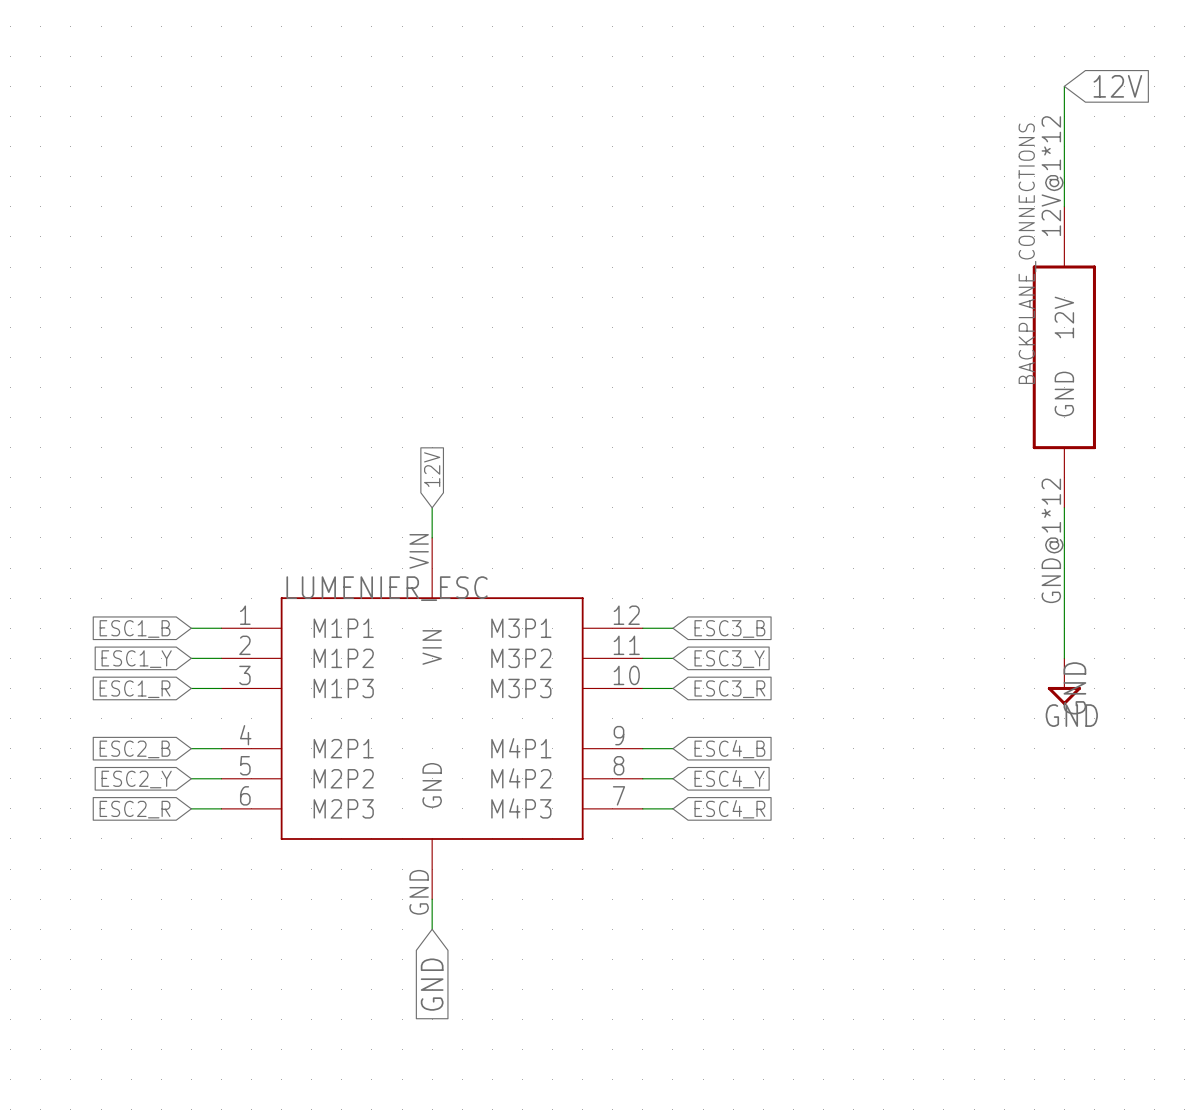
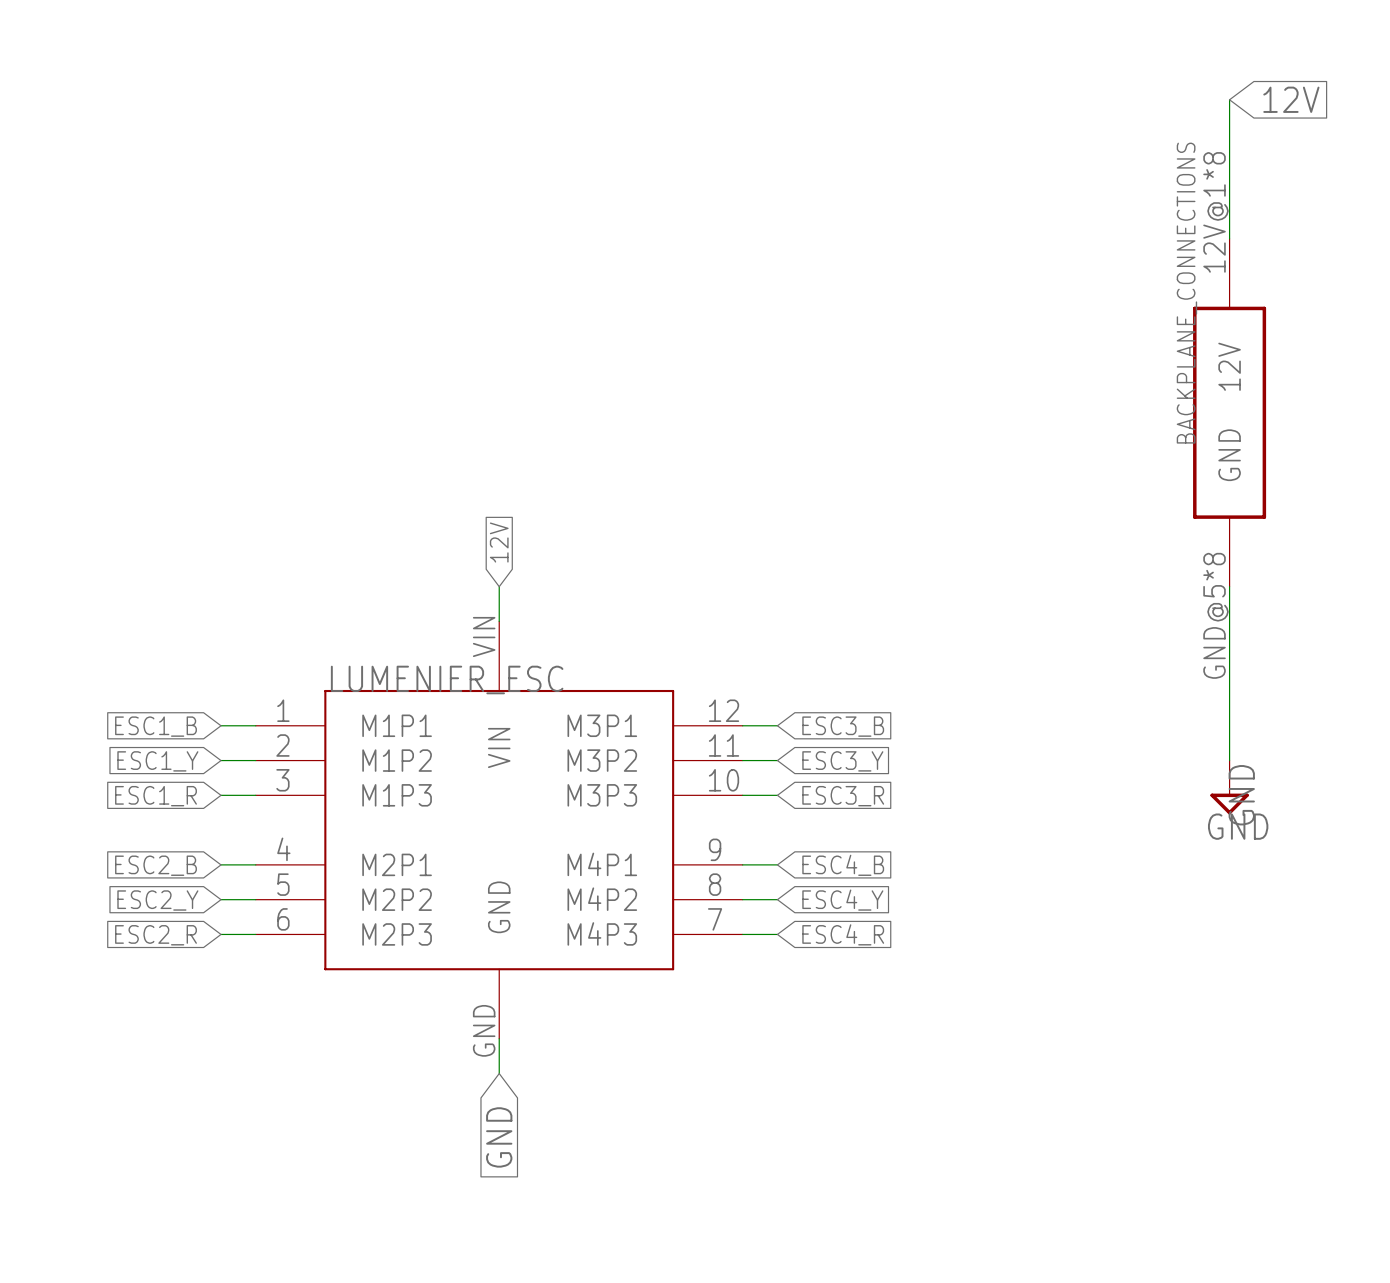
BACKPLANE_CONNECTIONS pin number: 12V@1*12 (1052, 176) -> 12V@1*8 (1216, 212)
BACKPLANE_CONNECTIONS pin number: GND@1*12 (1052, 540) -> GND@5*8 (1216, 615)

